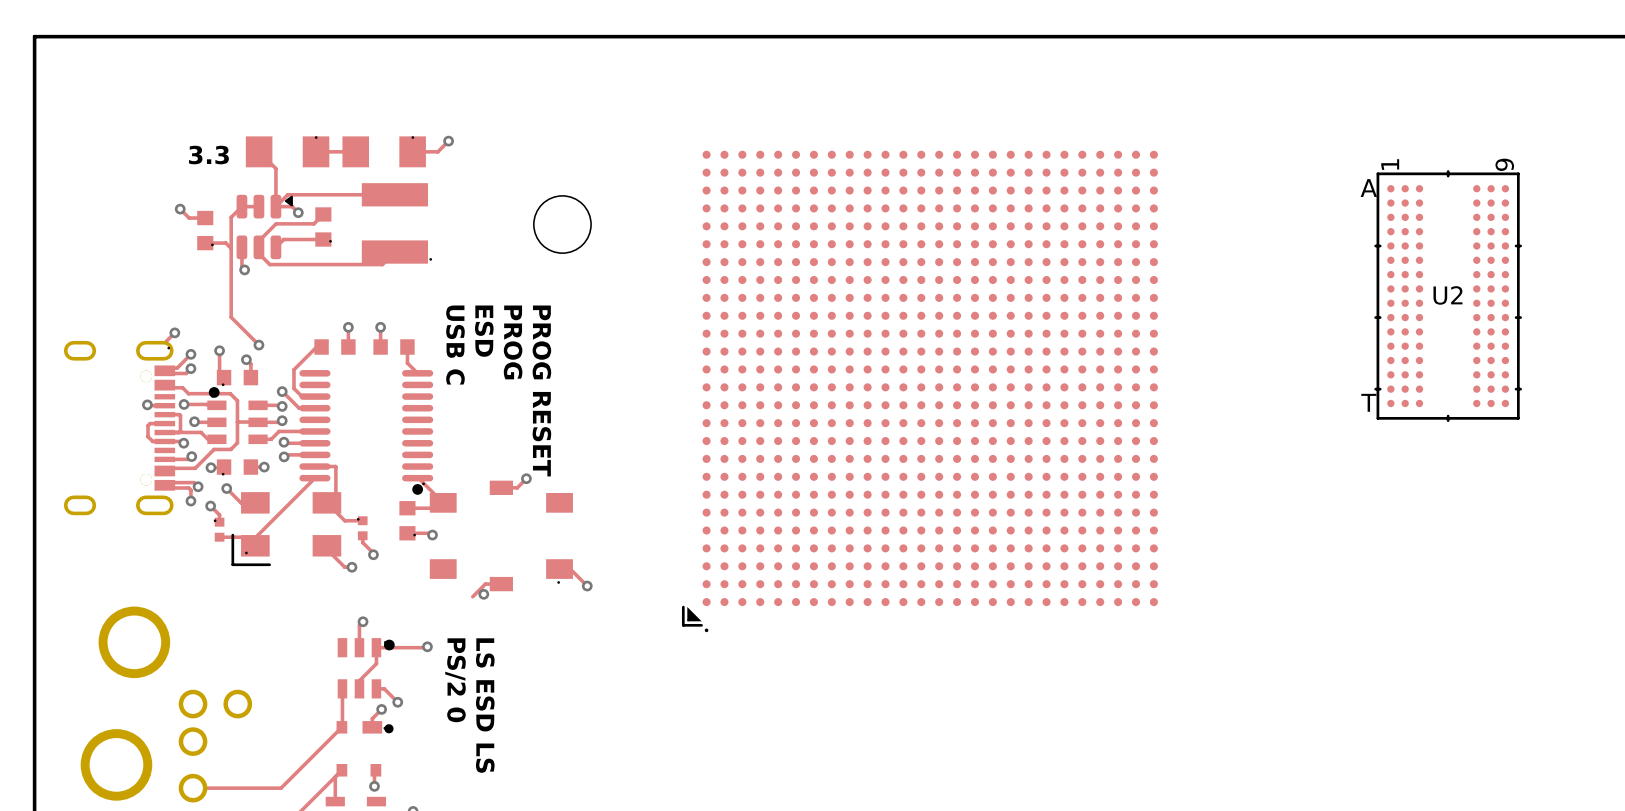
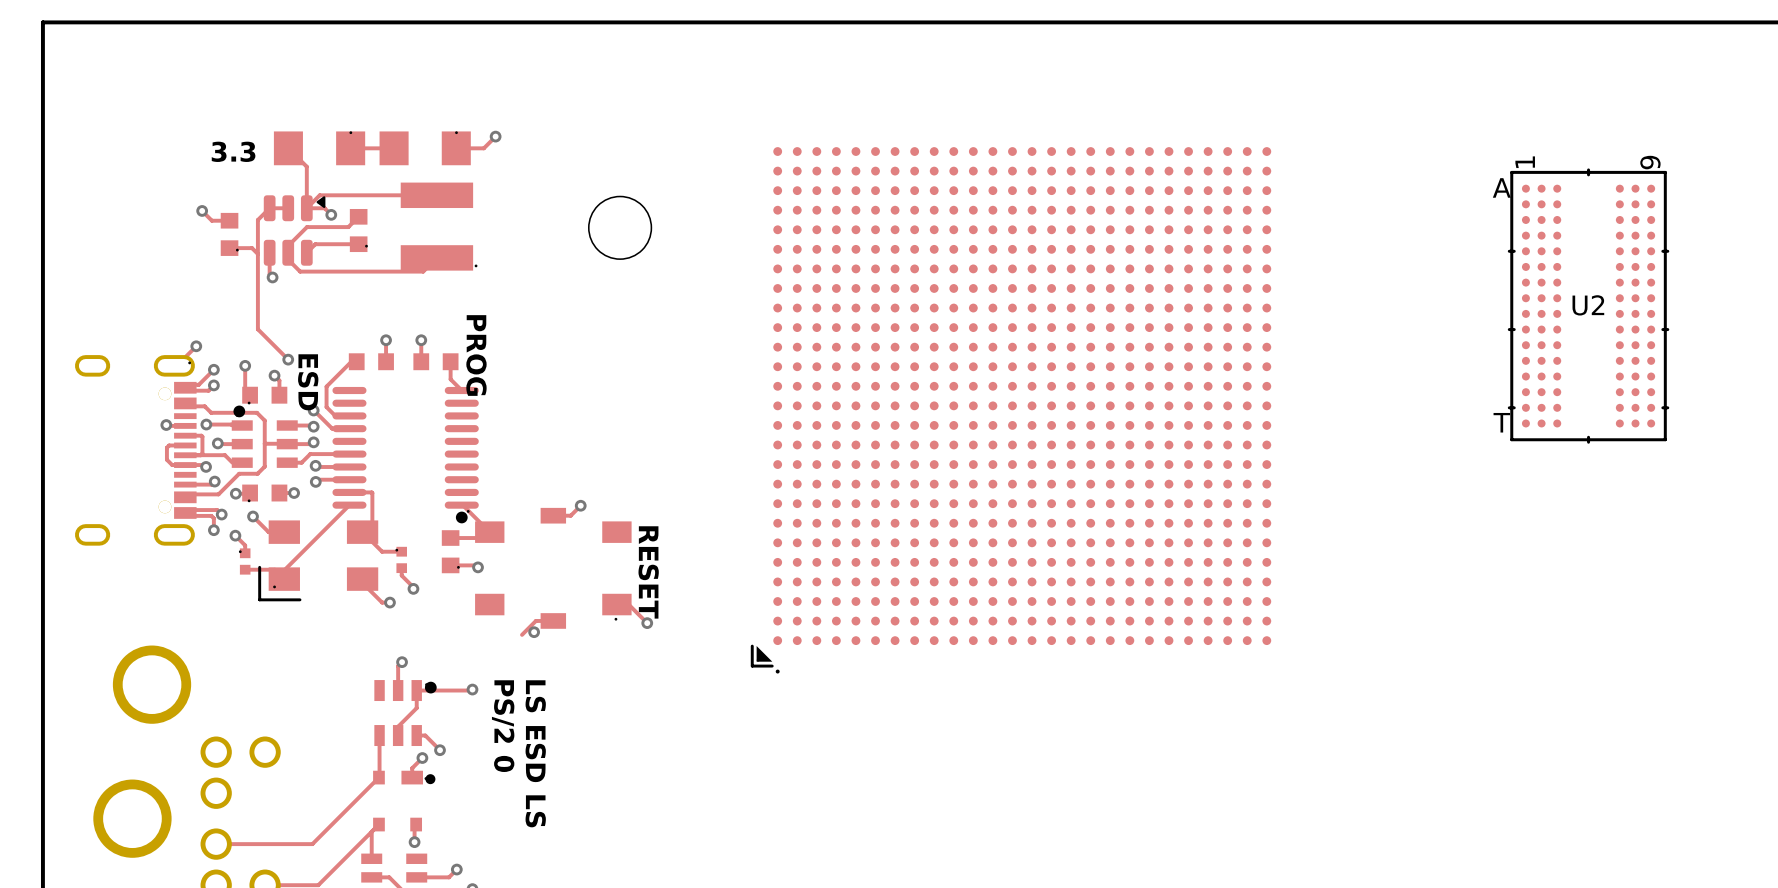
text position: ESD (484, 331) -> ESD (308, 382)
text position: PROG (513, 342) -> PROG (476, 355)
text: USB C (455, 345) -> none
text: PROG RESET (541, 390) -> none
text: none -> RESET (648, 572)

